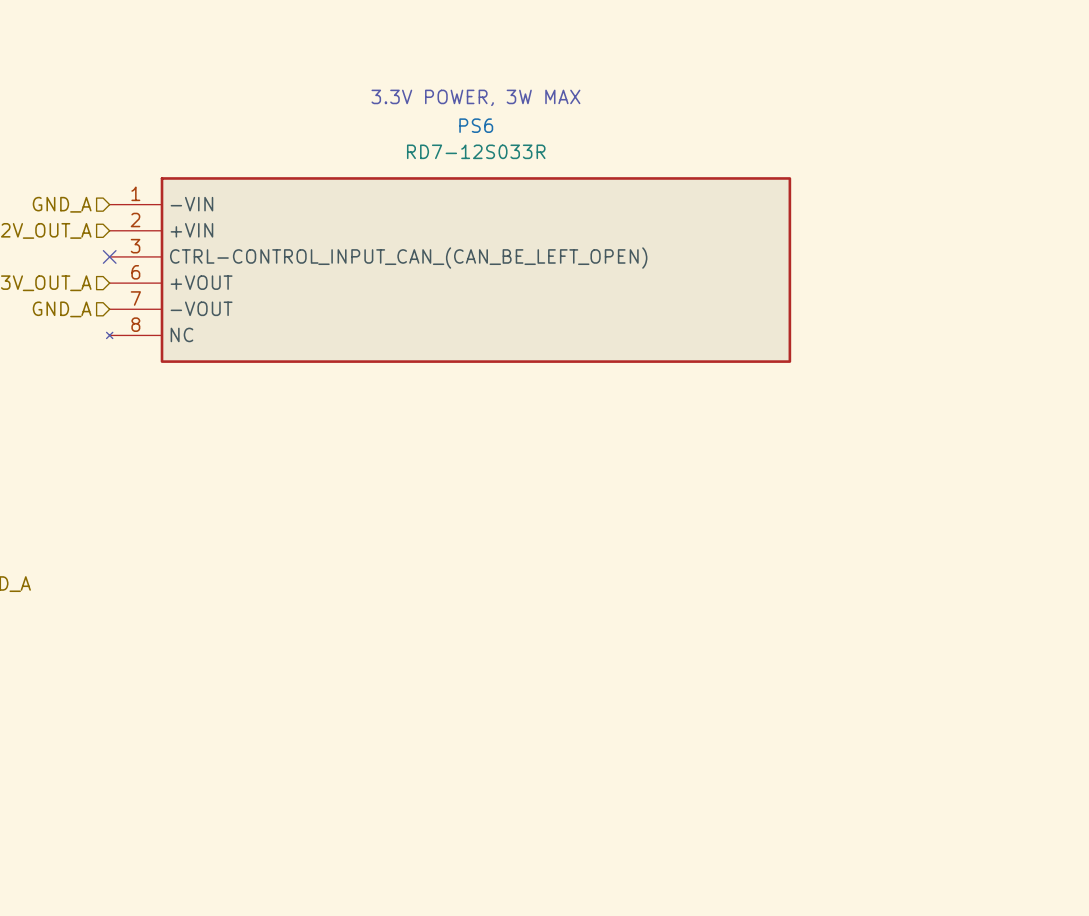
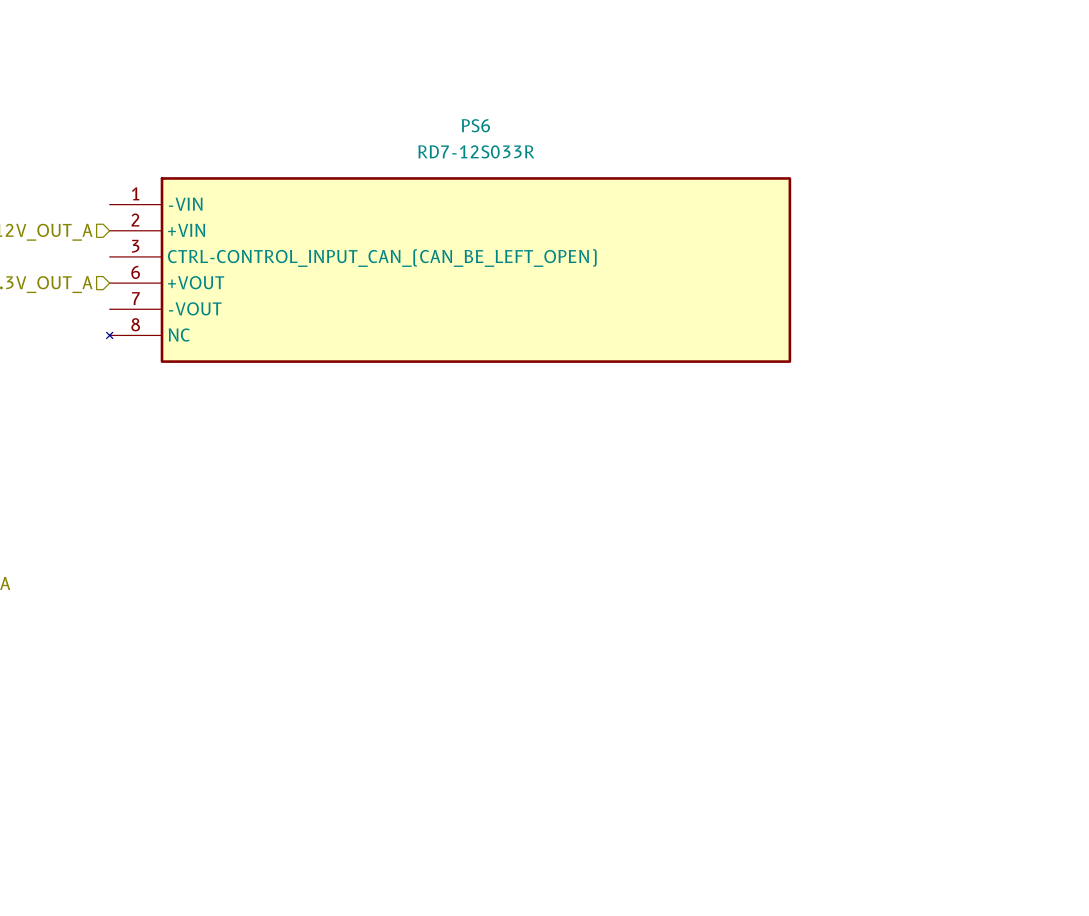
text: 3.3V POWER, 3W MAX (475, 97) -> none
hierarchical label: GND_A (62, 204) -> none
no-connect mark: (109, 256) -> none
hierarchical label: GND_A (62, 309) -> none

